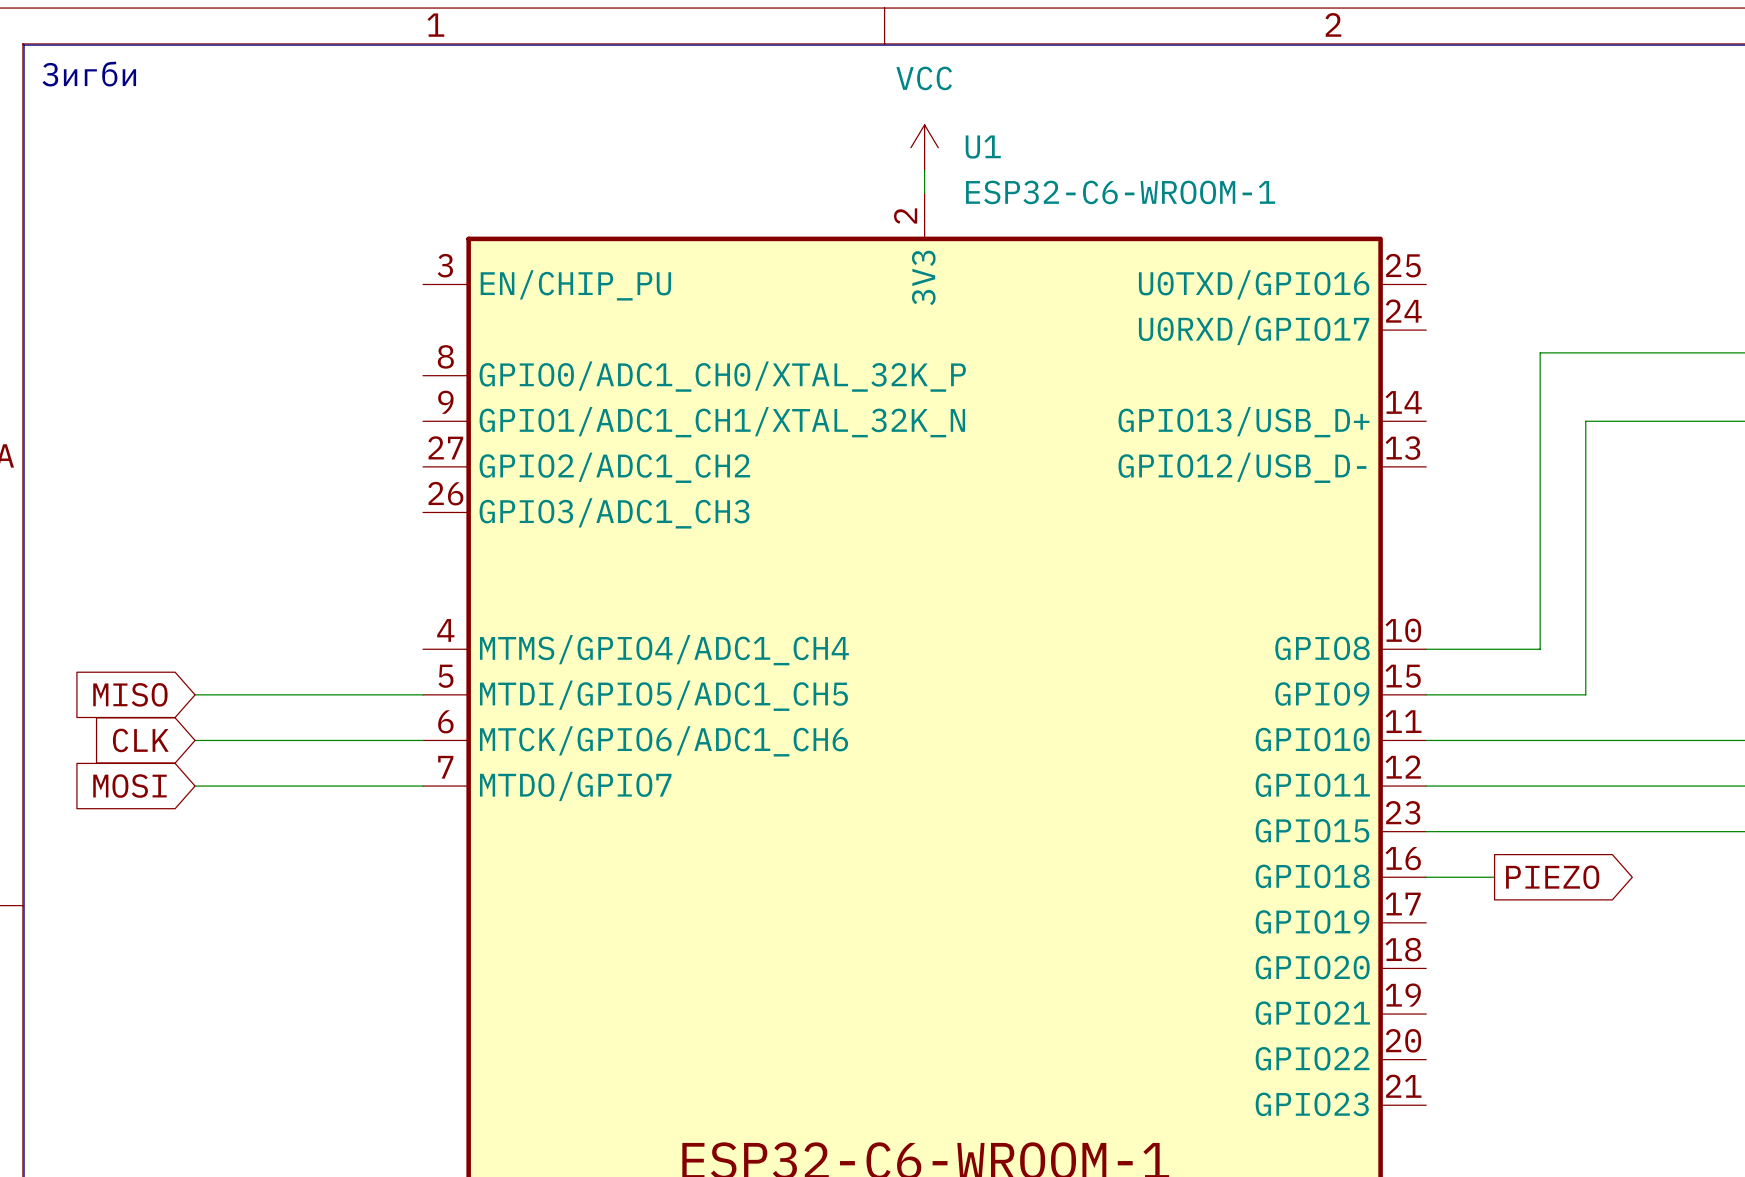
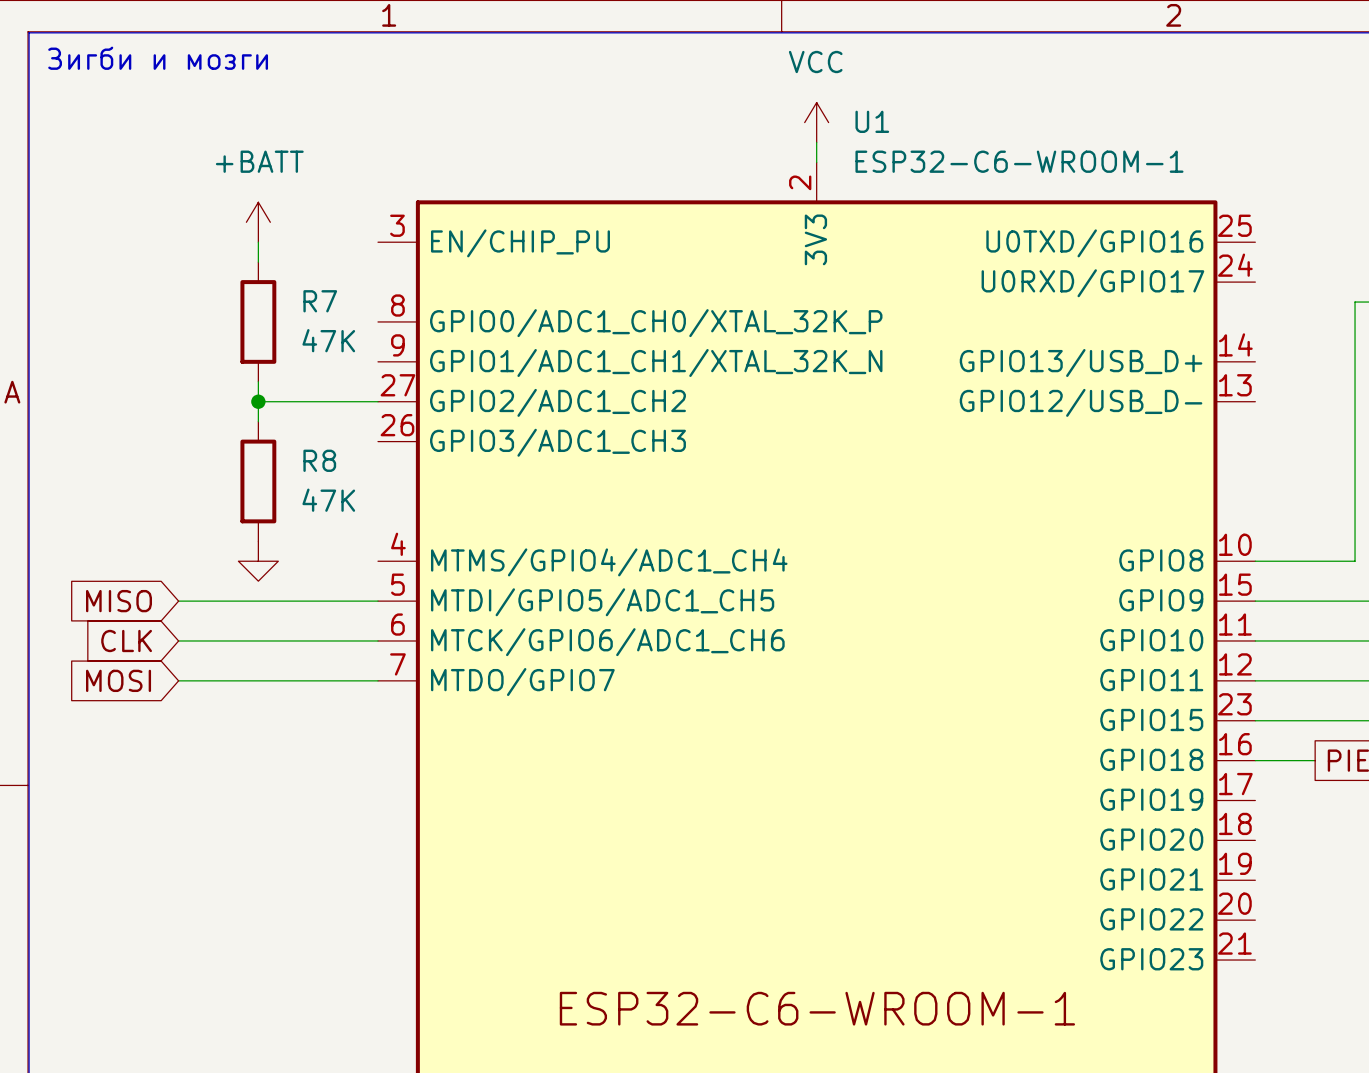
text: Зигби (89, 74) -> Зигби и мозги (158, 58)
power symbol: none -> +BATT (258, 222)
wire: none -> (258, 242) (258, 262)
R7: none -> 47K (258, 321)
wire: none -> (258, 381) (258, 421)
wire: none -> (258, 401) (378, 401)
junction: none -> (258, 401)
R8: none -> 47K (258, 481)
power symbol: none -> (258, 561)

